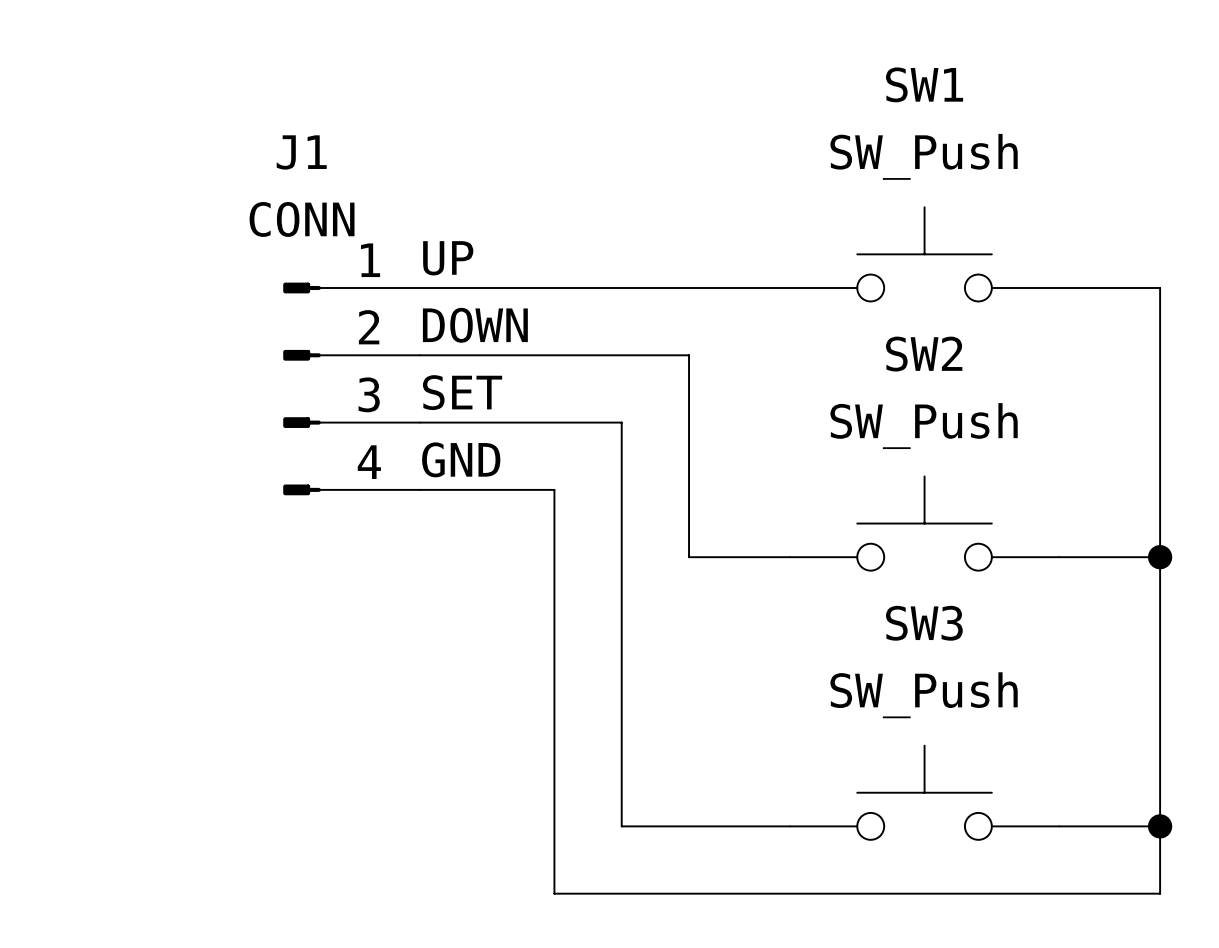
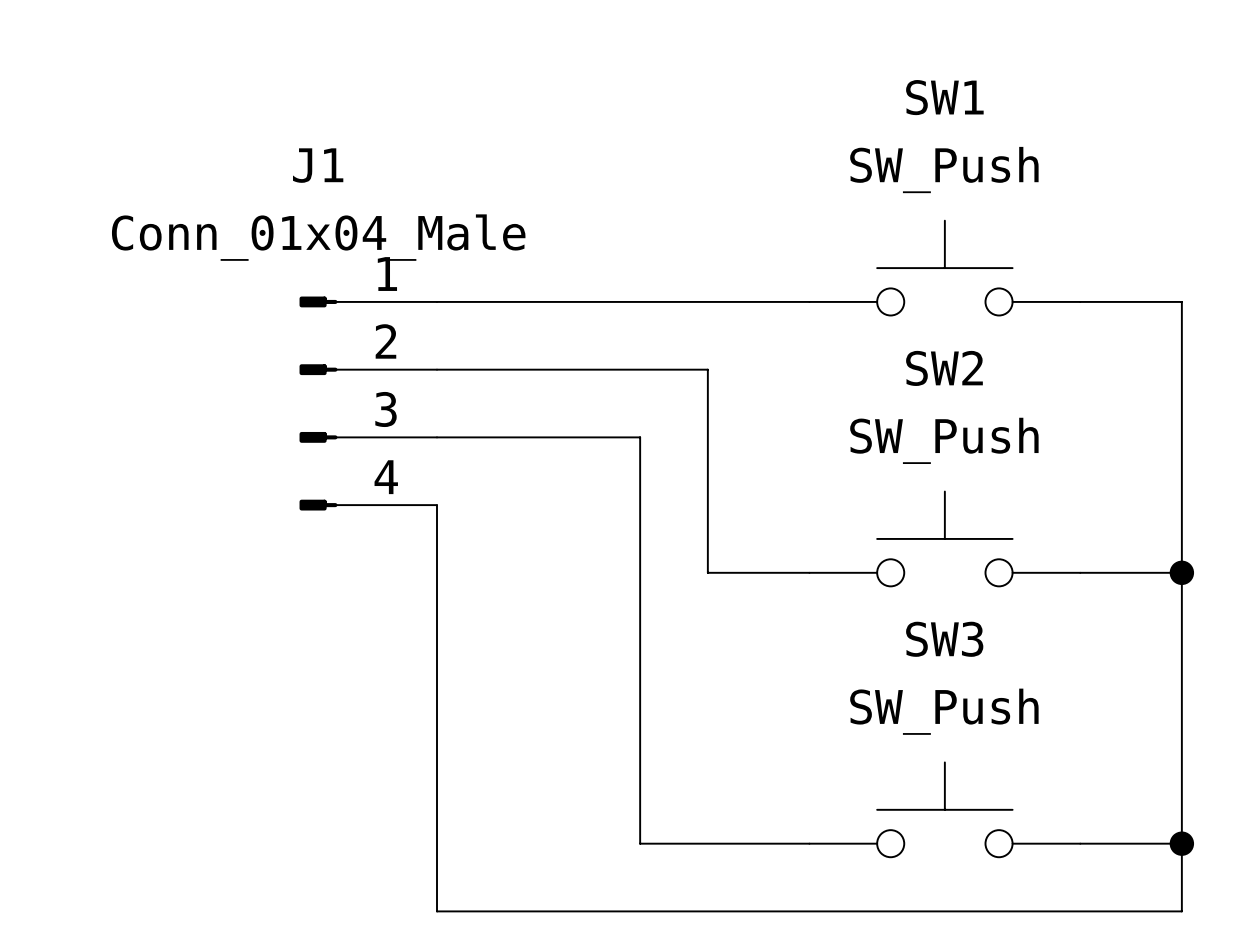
J1 value: CONN (302, 219) -> Conn_01x04_Male (318, 237)
label: UP (448, 258) -> none
label: DOWN (475, 325) -> none
label: SET (462, 392) -> none
label: GND (461, 459) -> none
wire: (419, 489) (554, 489) (554, 893) -> (437, 505) (437, 911) (572, 911)

